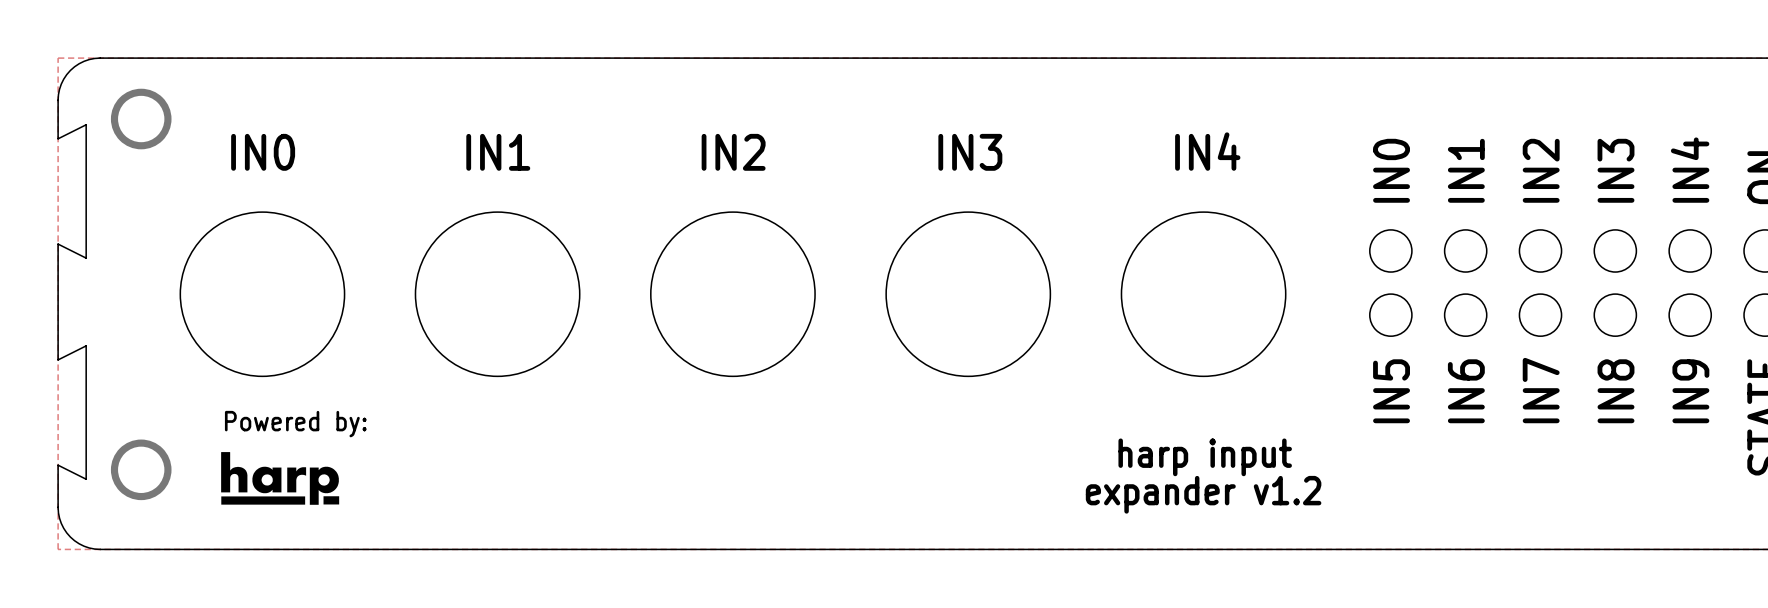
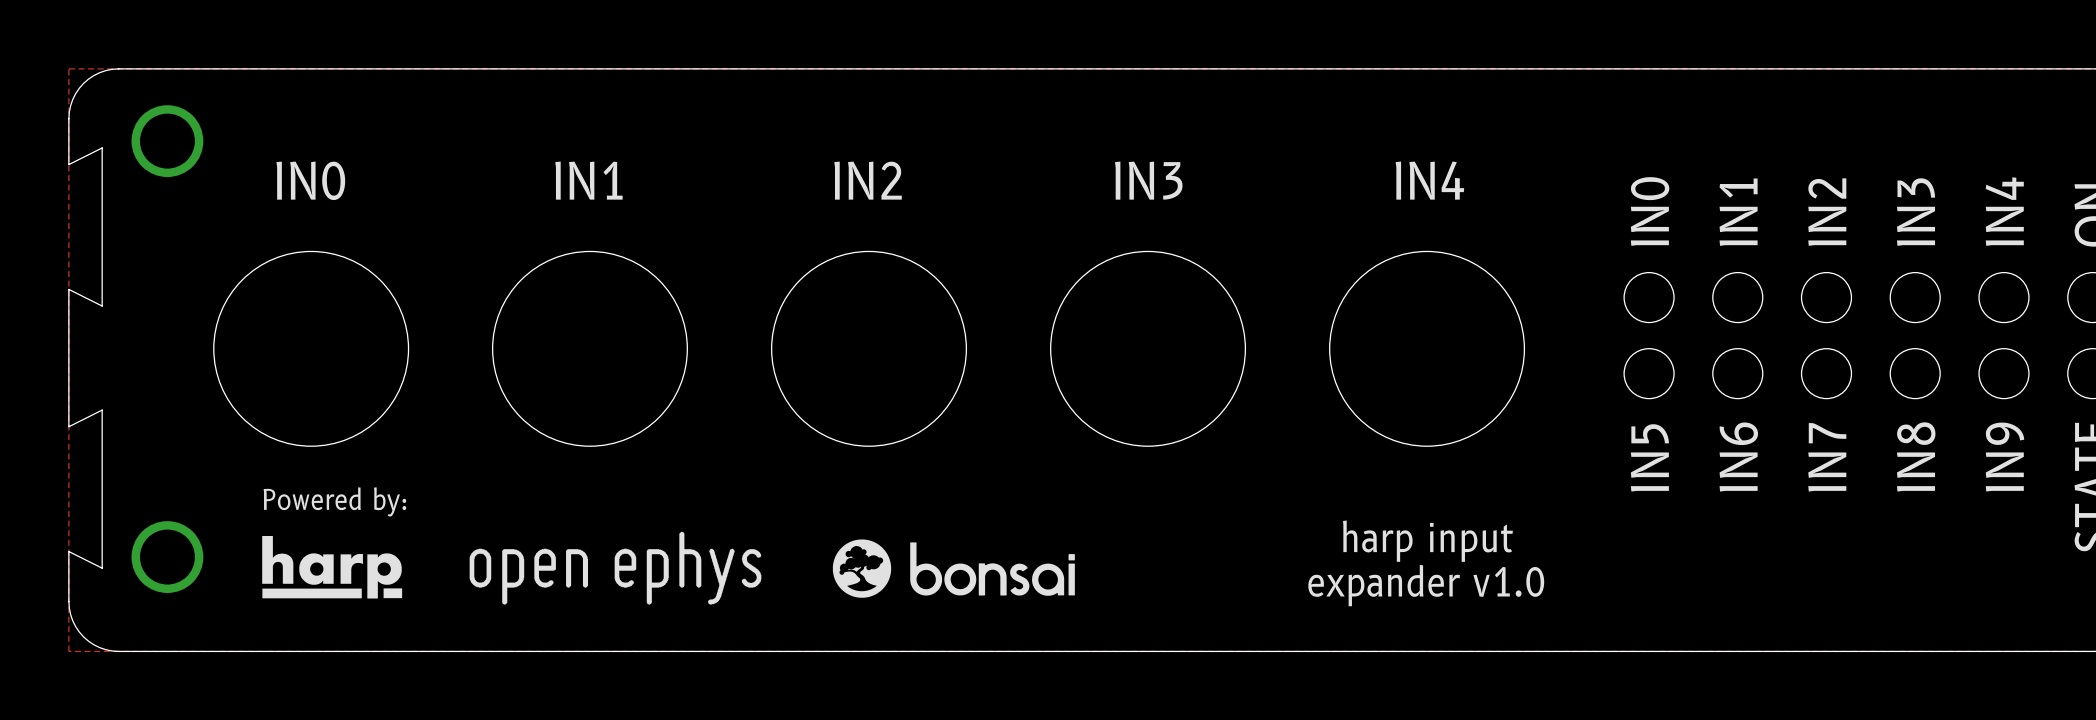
drawing: none -> [469, 531, 762, 605]
drawing: none -> [832, 539, 1075, 598]
text: expander v1.2 (1203, 494) -> expander v1.0 (1426, 585)

